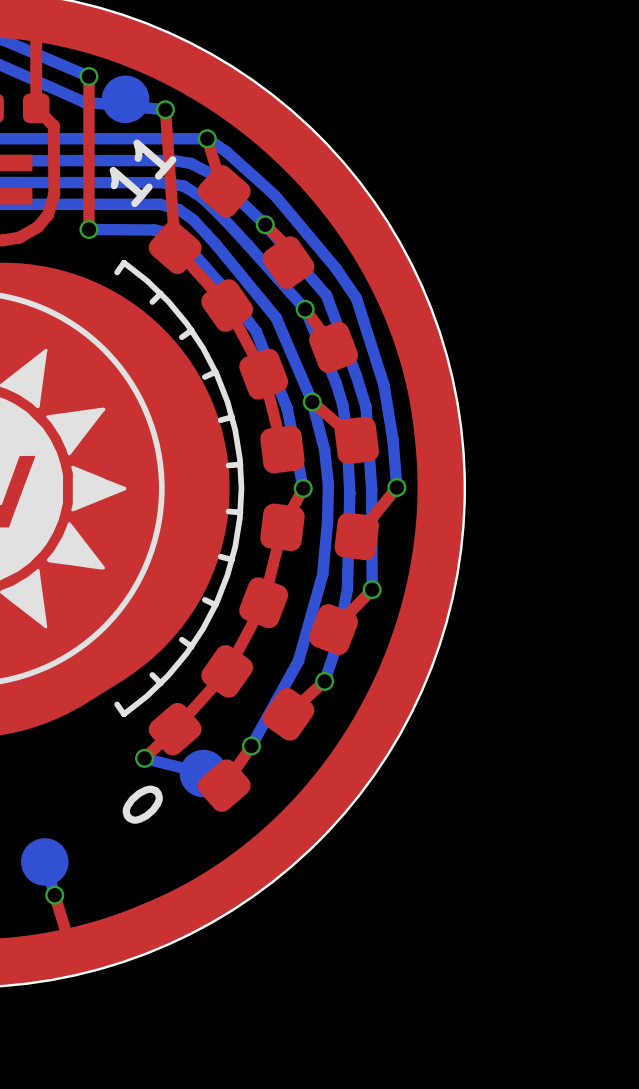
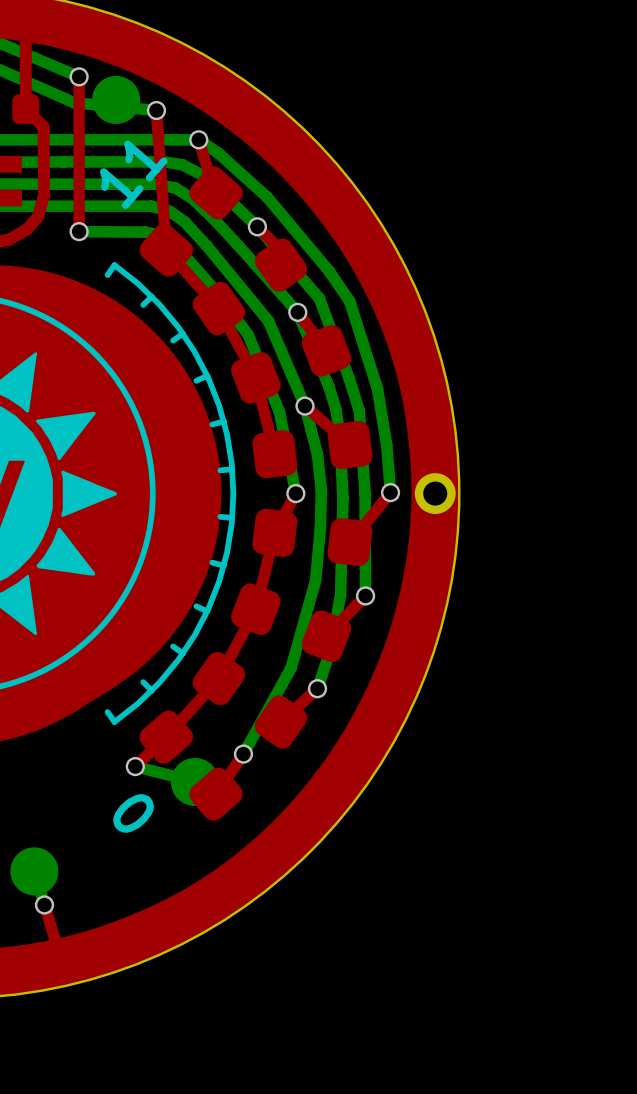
part: none -> (435, 493)

